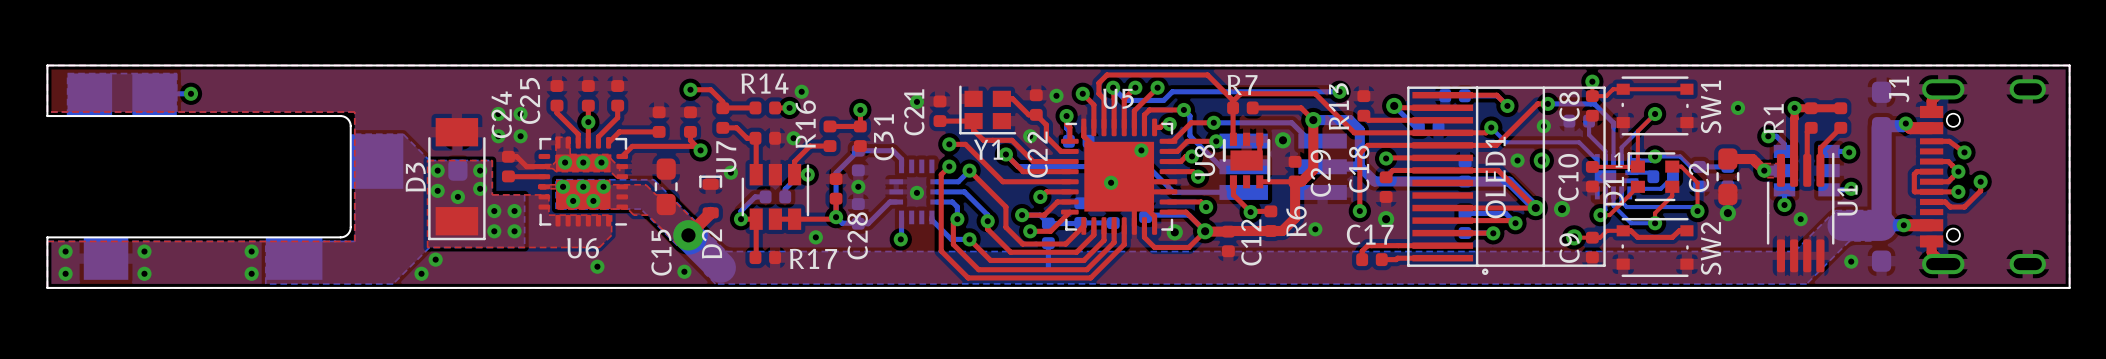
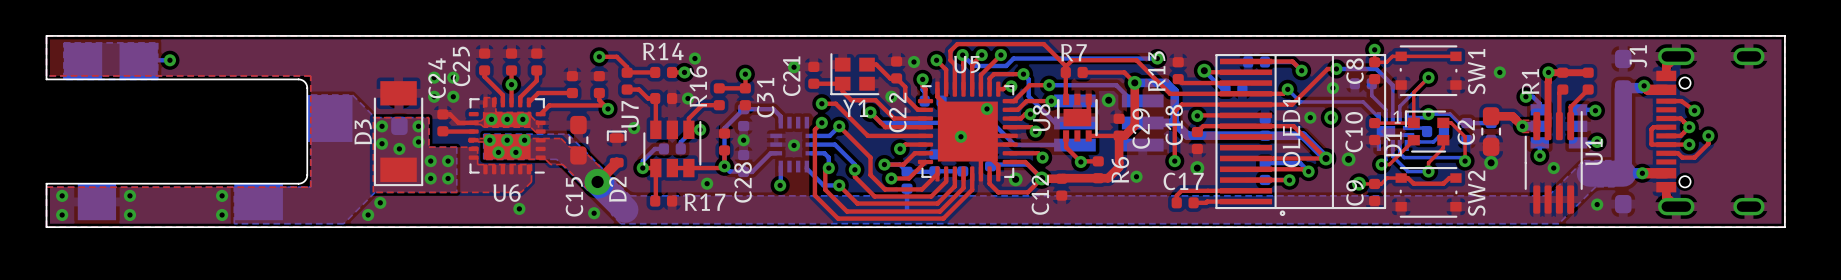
C12 name position: C12 (1251, 242) -> C12 (1040, 195)

